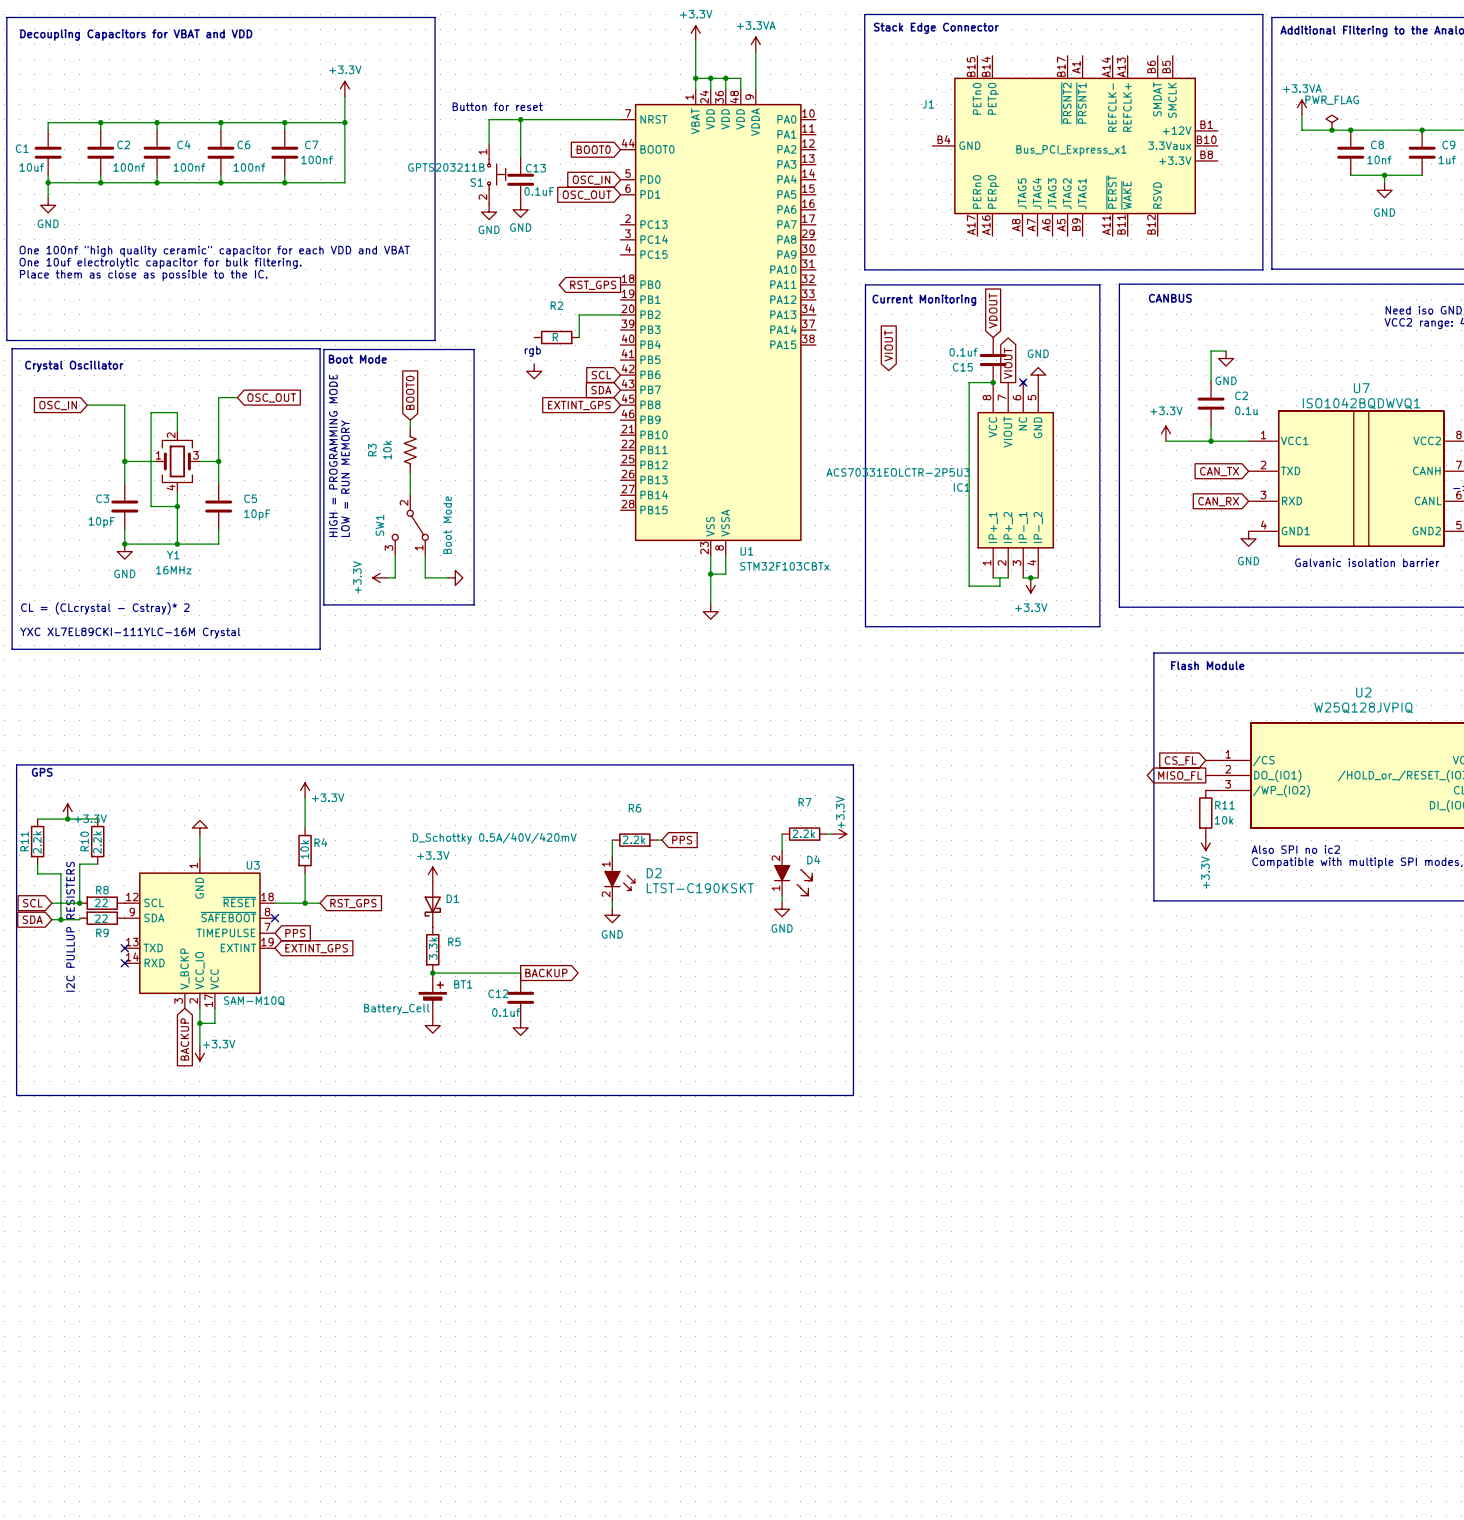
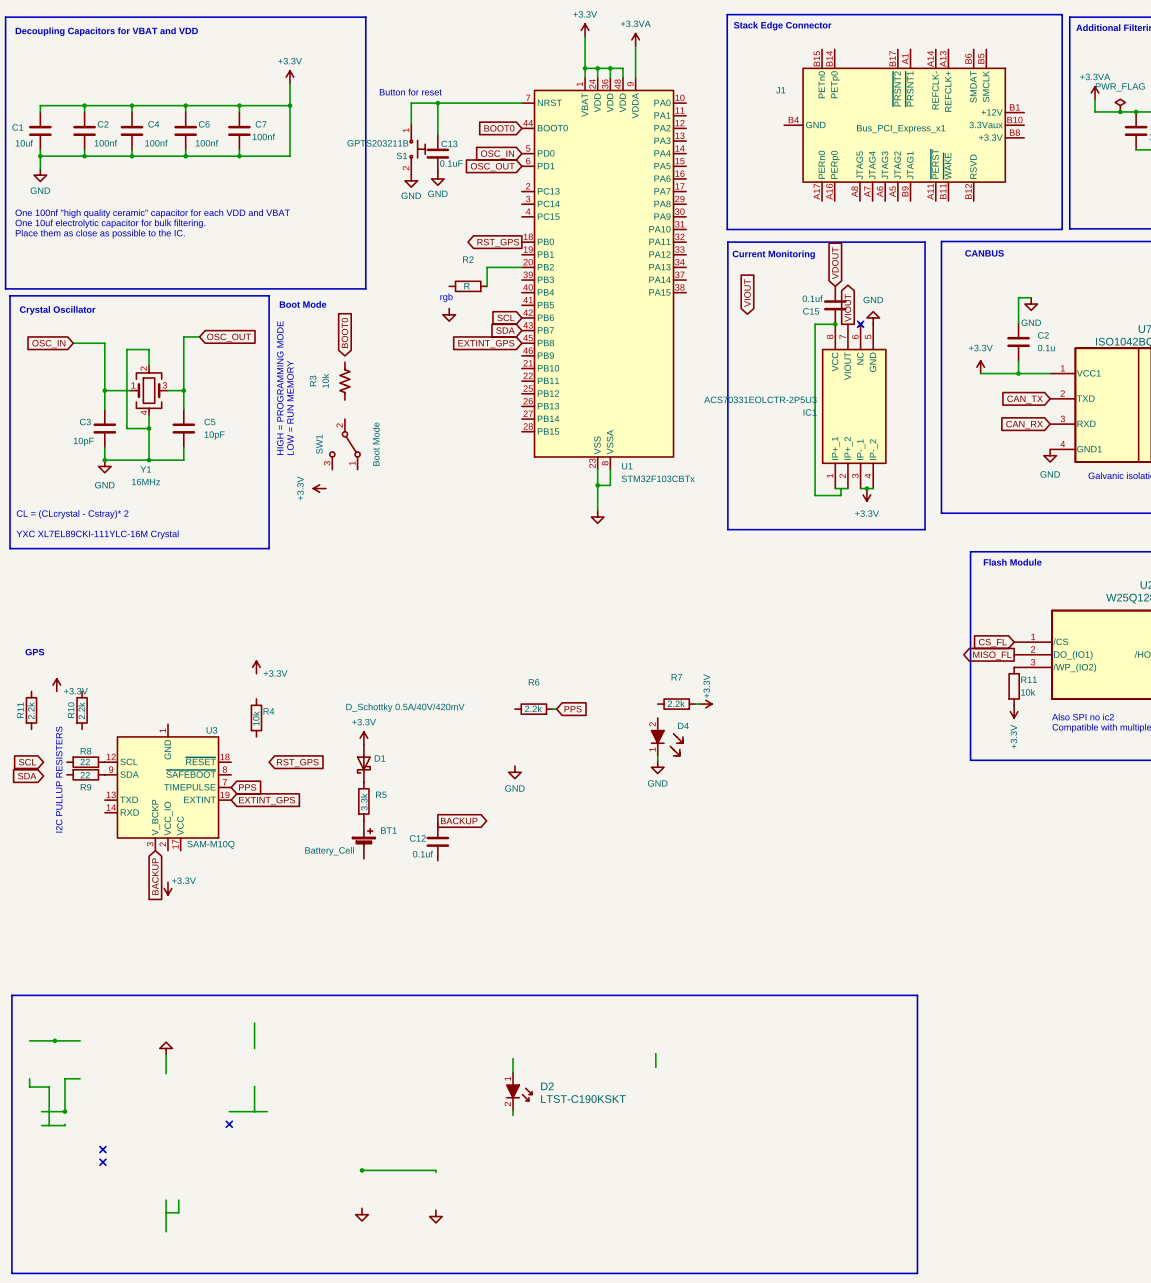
line: (323, 349) (474, 349) (474, 604) (323, 604) (323, 349) -> none
wire: (410, 420) (410, 427) -> none
wire: (410, 472) (410, 495) -> none
wire: (395, 555) (395, 577) (387, 577) -> none
wire: (425, 555) (425, 577) (447, 577) -> none
power symbol: (455, 577) -> none
line: (16, 764) (853, 764) (853, 1095) (16, 1095) (16, 764) -> none
wire: (305, 798) (305, 828) -> none
wire: (37, 819) (97, 819) -> none
junction: (67, 819) -> none
power symbol: (199, 828) -> none
wire: (782, 834) (782, 850) -> none
wire: (199, 835) (199, 858) -> none
wire: (612, 840) (612, 856) -> none
wire: (37, 864) (37, 873) (60, 873) (60, 919) -> none
wire: (97, 864) (79, 864) (79, 903) (51, 903) -> none
wire: (305, 873) (305, 903) -> none
D2 position: (619, 879) -> (519, 1091)
wire: (612, 901) (612, 907) -> none
junction: (79, 903) -> none
wire: (275, 903) (320, 903) -> none
junction: (305, 903) -> none
wire: (79, 918) (79, 919) (51, 919) -> none
no-connect mark: (275, 918) -> none
junction: (60, 919) -> none
no-connect mark: (124, 948) -> none
no-connect mark: (124, 963) -> none
wire: (432, 972) (520, 973) (520, 975) -> none
junction: (432, 973) -> none
wire: (199, 1008) (199, 1045) -> none
wire: (214, 1008) (214, 1023) (199, 1023) -> none
junction: (199, 1023) -> none
power symbol: (432, 1025) -> none
power symbol: (520, 1027) -> none
line: none -> (11, 995) (917, 995) (917, 1273) (11, 1273) (11, 995)
wire: none -> (254, 1023) (254, 1048)
wire: none -> (29, 1040) (80, 1040)
junction: none -> (54, 1040)
power symbol: none -> (166, 1048)
wire: none -> (655, 1053) (655, 1067)
wire: none -> (166, 1054) (166, 1073)
wire: none -> (513, 1058) (513, 1072)
wire: none -> (29, 1078) (29, 1087) (49, 1087) (49, 1125)
wire: none -> (80, 1078) (64, 1078) (64, 1111) (41, 1111)
wire: none -> (254, 1086) (254, 1111)
wire: none -> (513, 1110) (513, 1115)
junction: none -> (64, 1111)
wire: none -> (229, 1111) (267, 1111)
wire: none -> (64, 1124) (41, 1125)
no-connect mark: none -> (229, 1124)
no-connect mark: none -> (102, 1149)
no-connect mark: none -> (102, 1162)
wire: none -> (362, 1169) (435, 1170) (435, 1172)
junction: none -> (362, 1170)
wire: none -> (166, 1200) (166, 1231)
wire: none -> (178, 1200) (178, 1212) (166, 1212)
power symbol: none -> (362, 1214)
power symbol: none -> (435, 1216)

